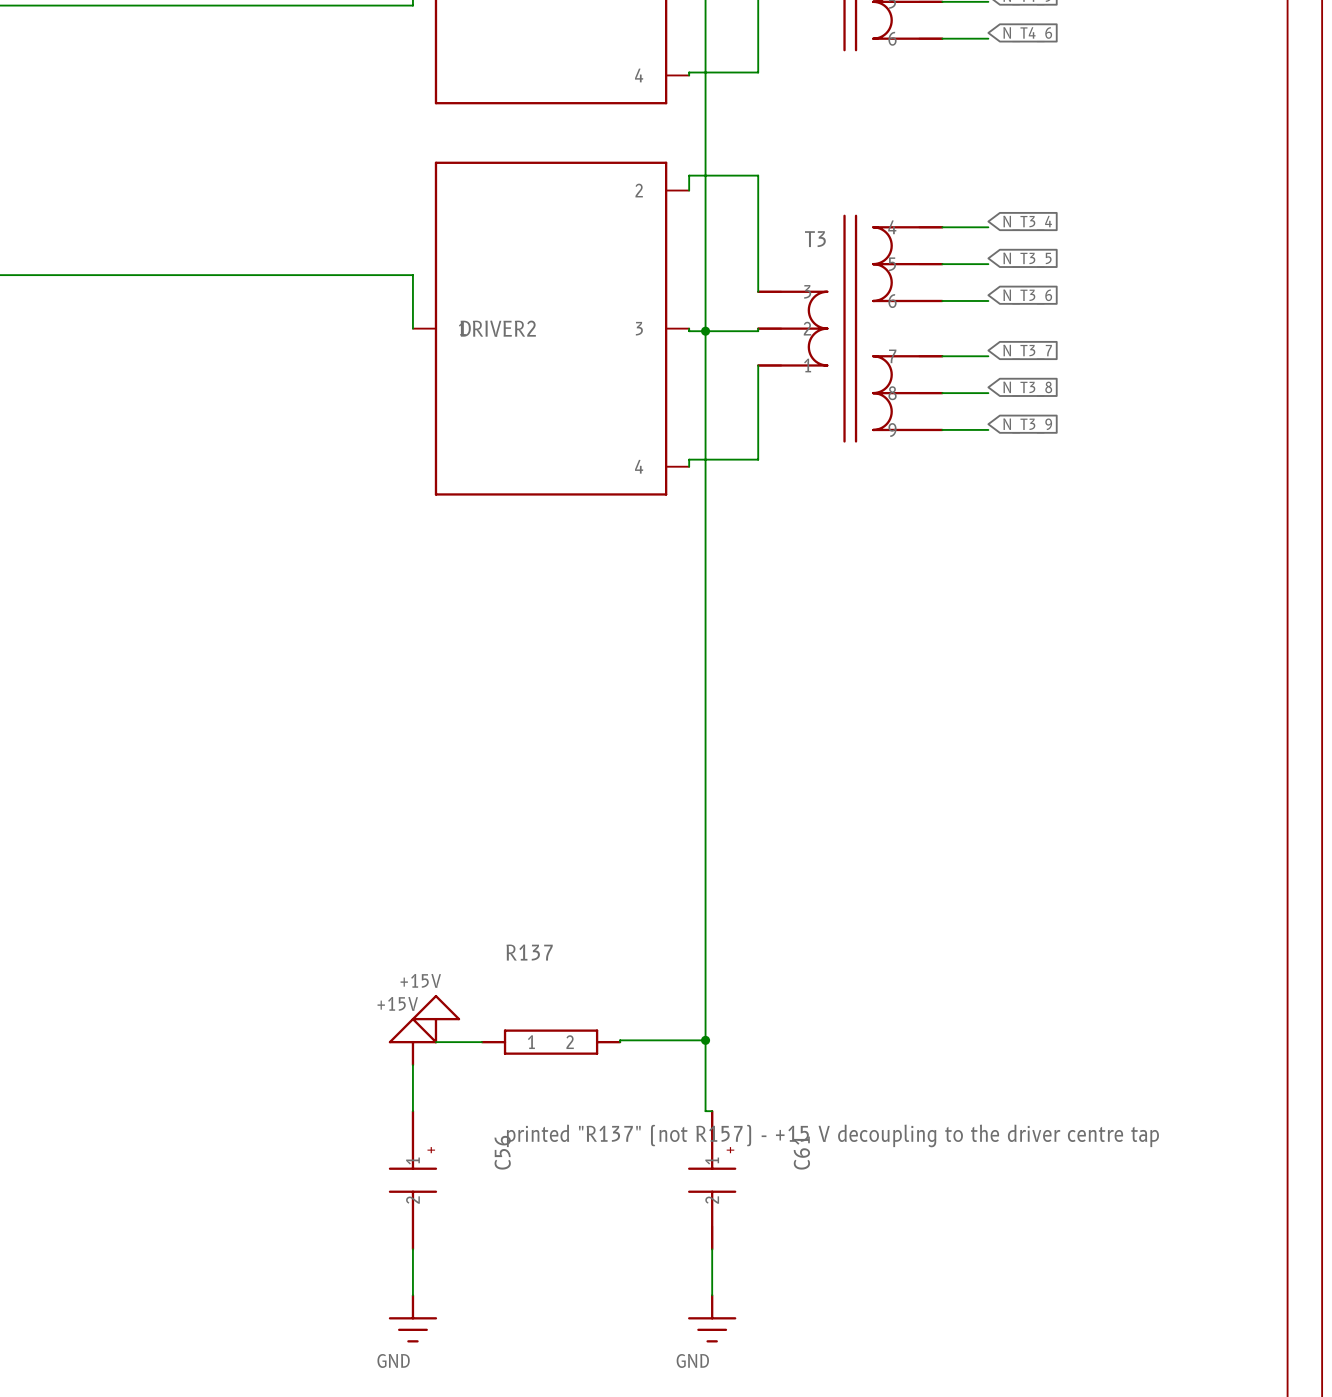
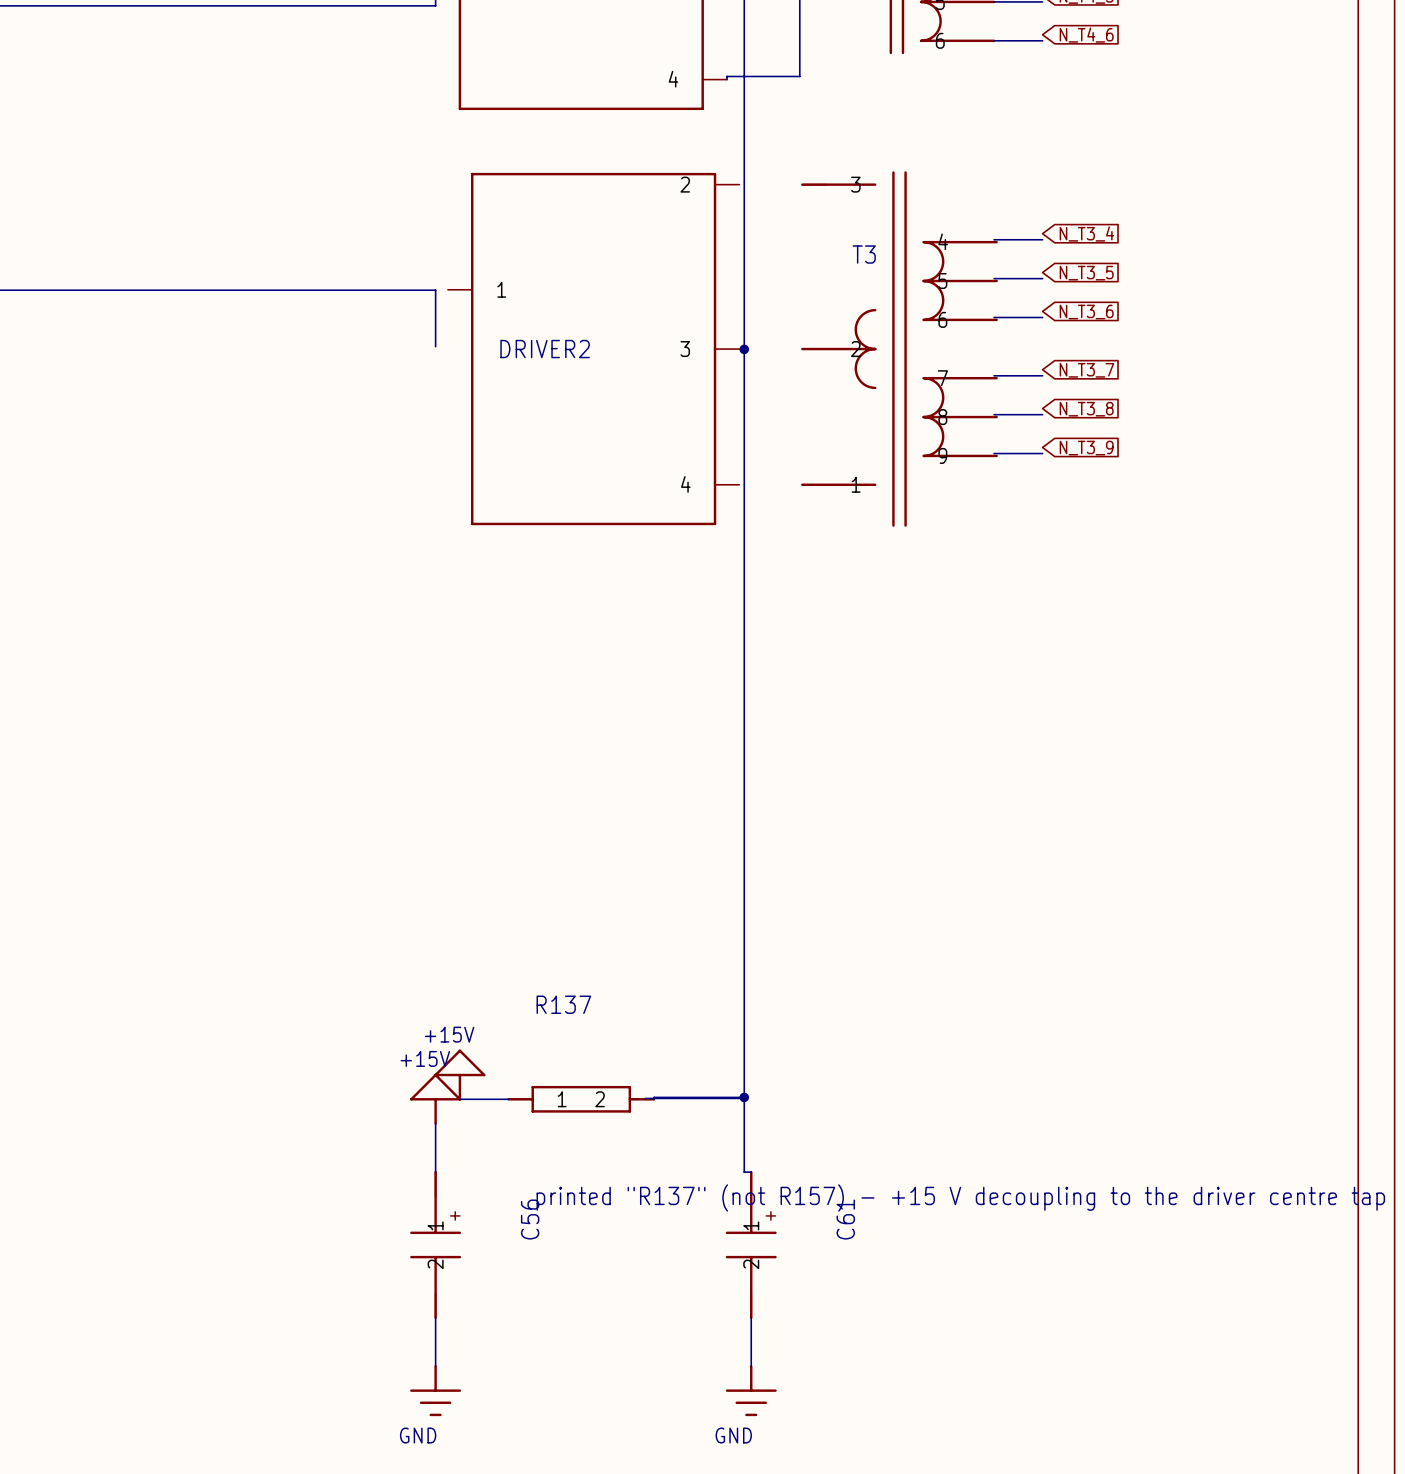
DRIVER2 symbol: [412, 161, 690, 496] -> [447, 172, 740, 526]
wire: (689, 190) (689, 175) (758, 175) (758, 291) -> none
T3 symbol: [757, 214, 944, 443] -> [801, 171, 998, 527]
wire: (689, 328) (689, 331) (758, 331) (758, 328) -> none
wire: (758, 365) (758, 459) (689, 459) (689, 466) -> none
wire: none -> (645, 1098) (746, 1098)

